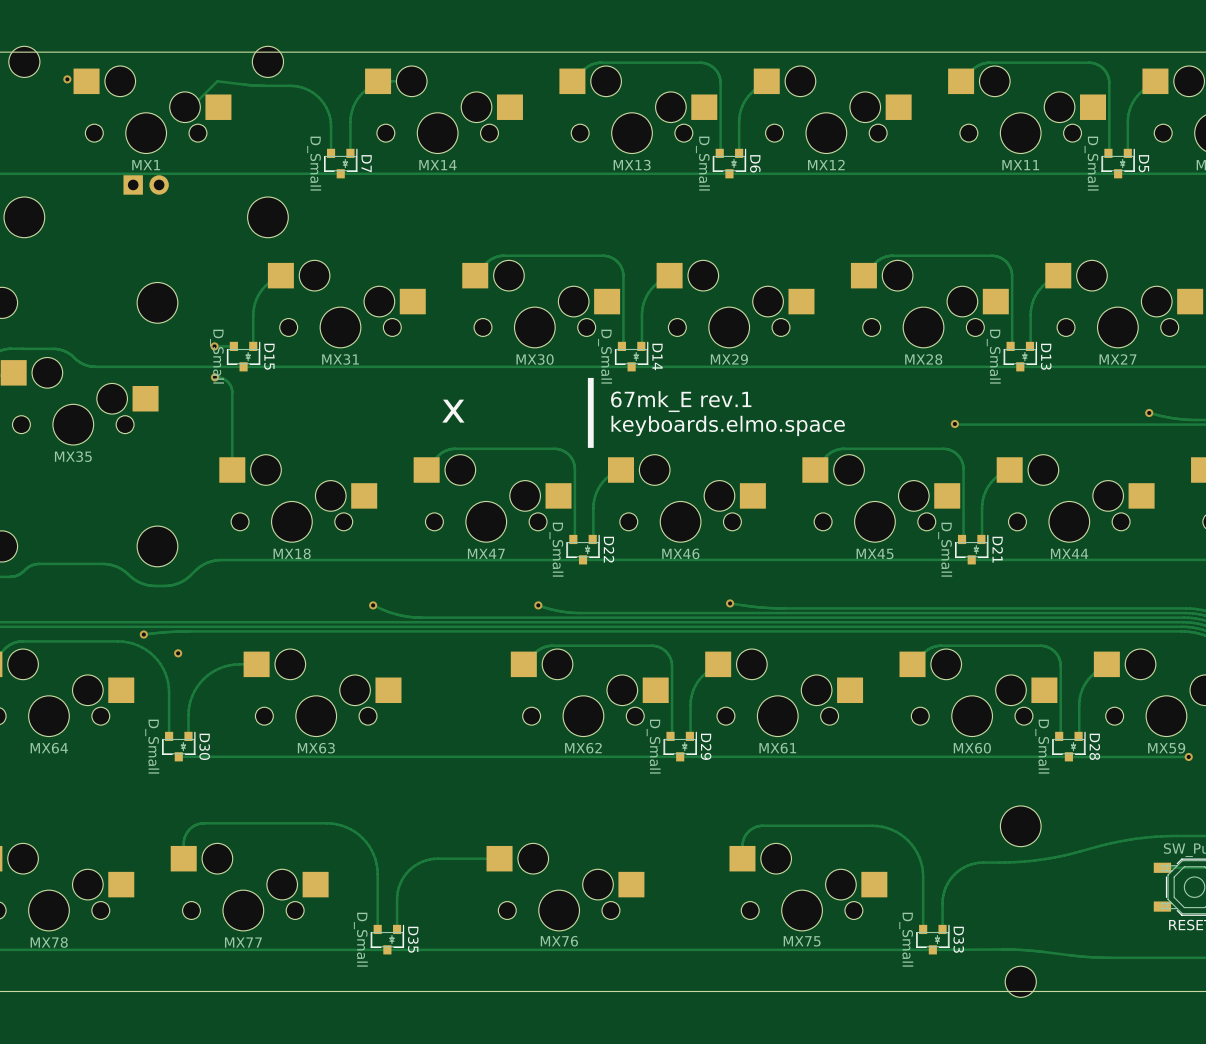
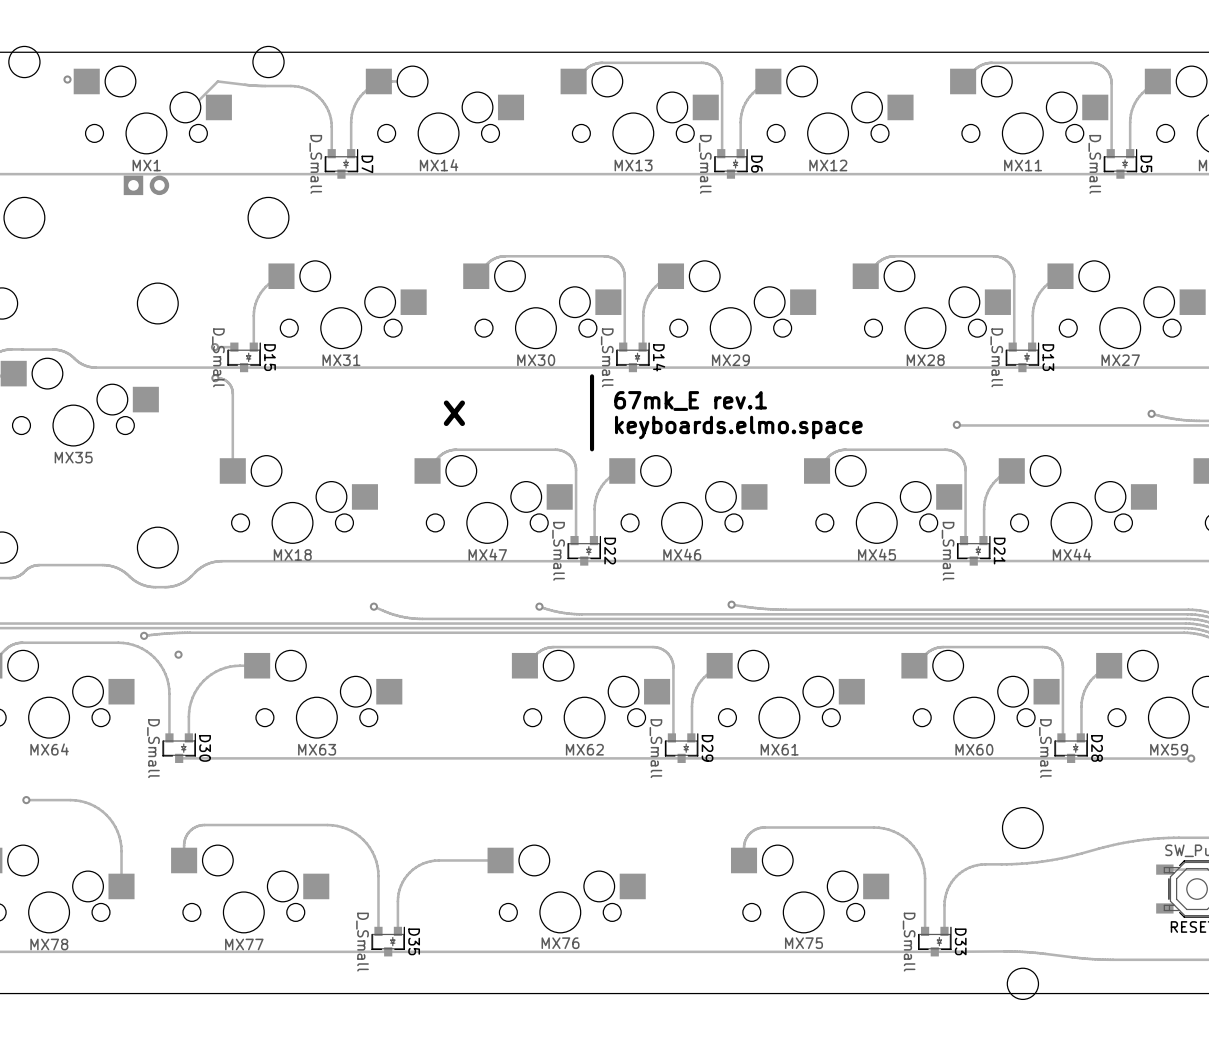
track: none -> (26, 800) (80, 801) (94, 806) (106, 815) (115, 827) (120, 841) (121, 886)
via: none -> (26, 800)

